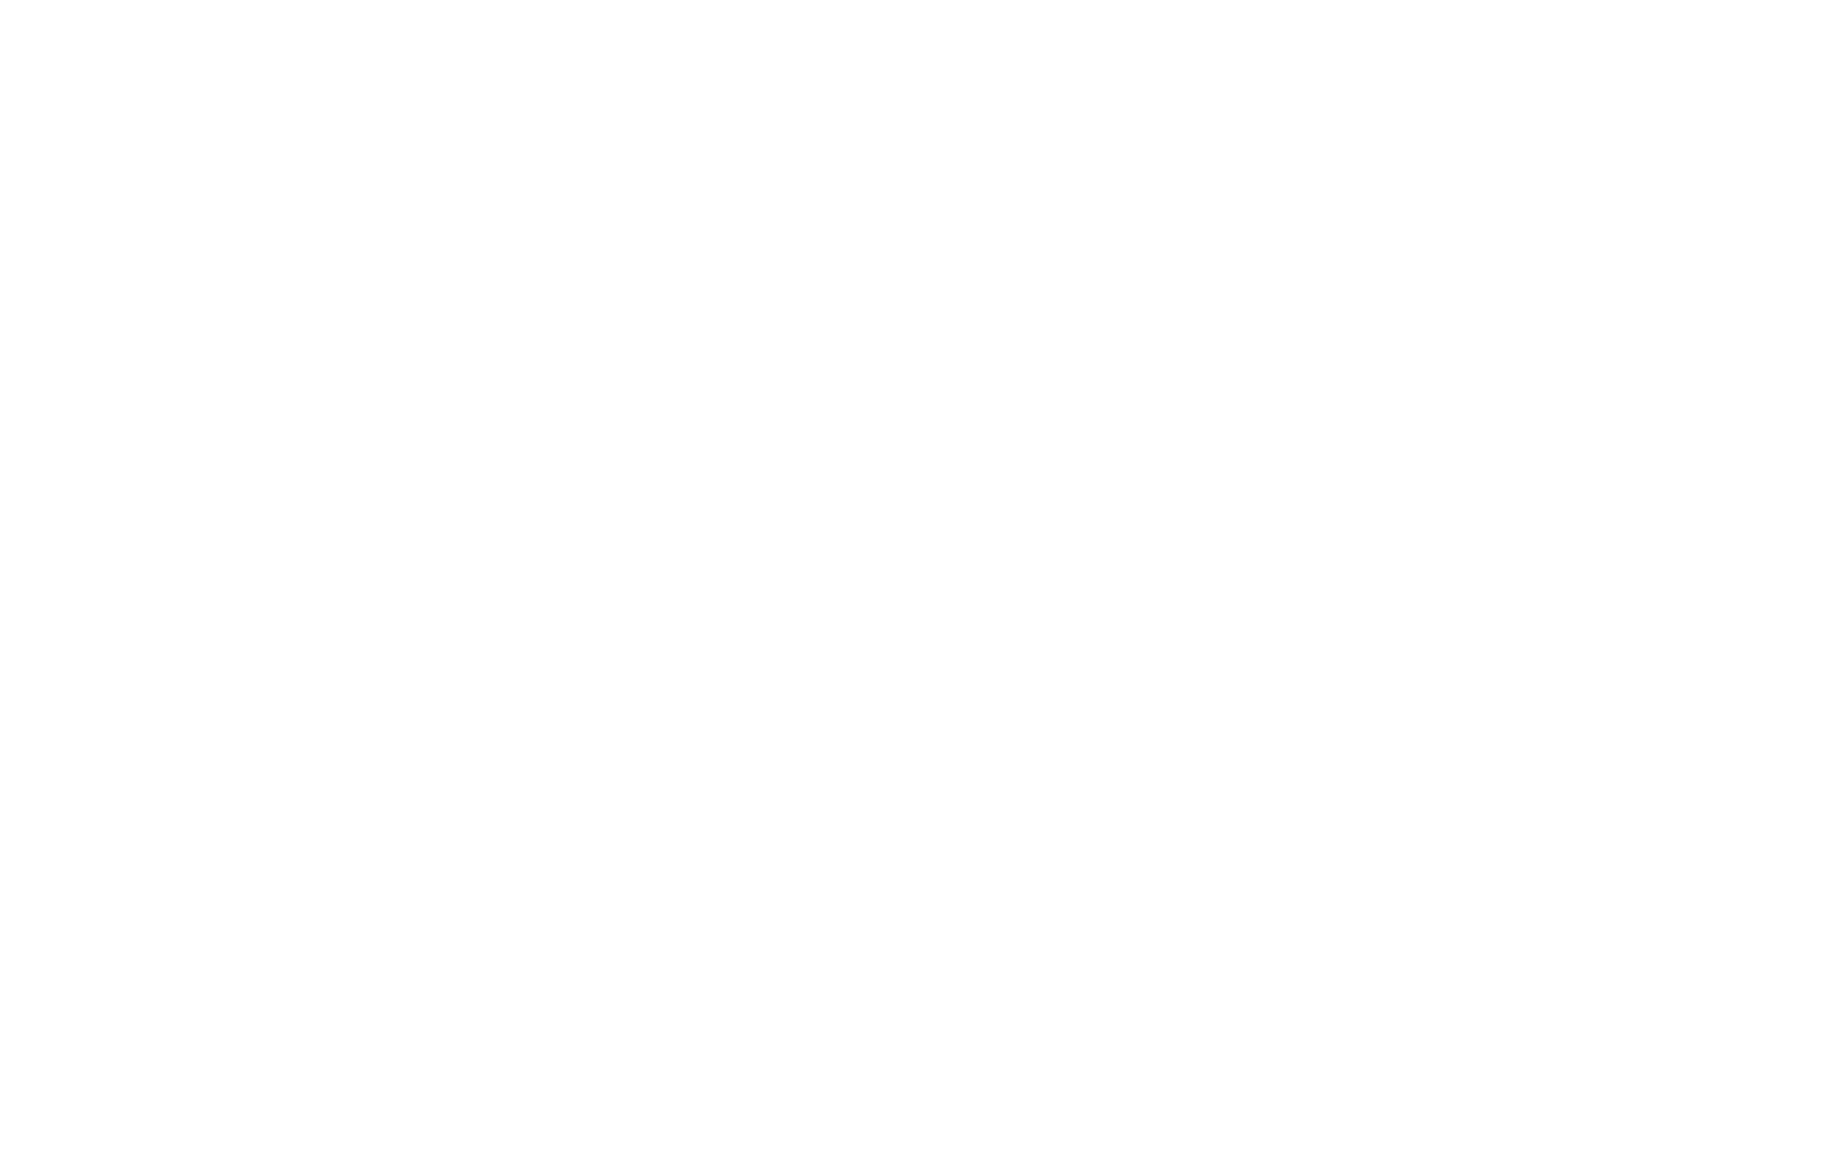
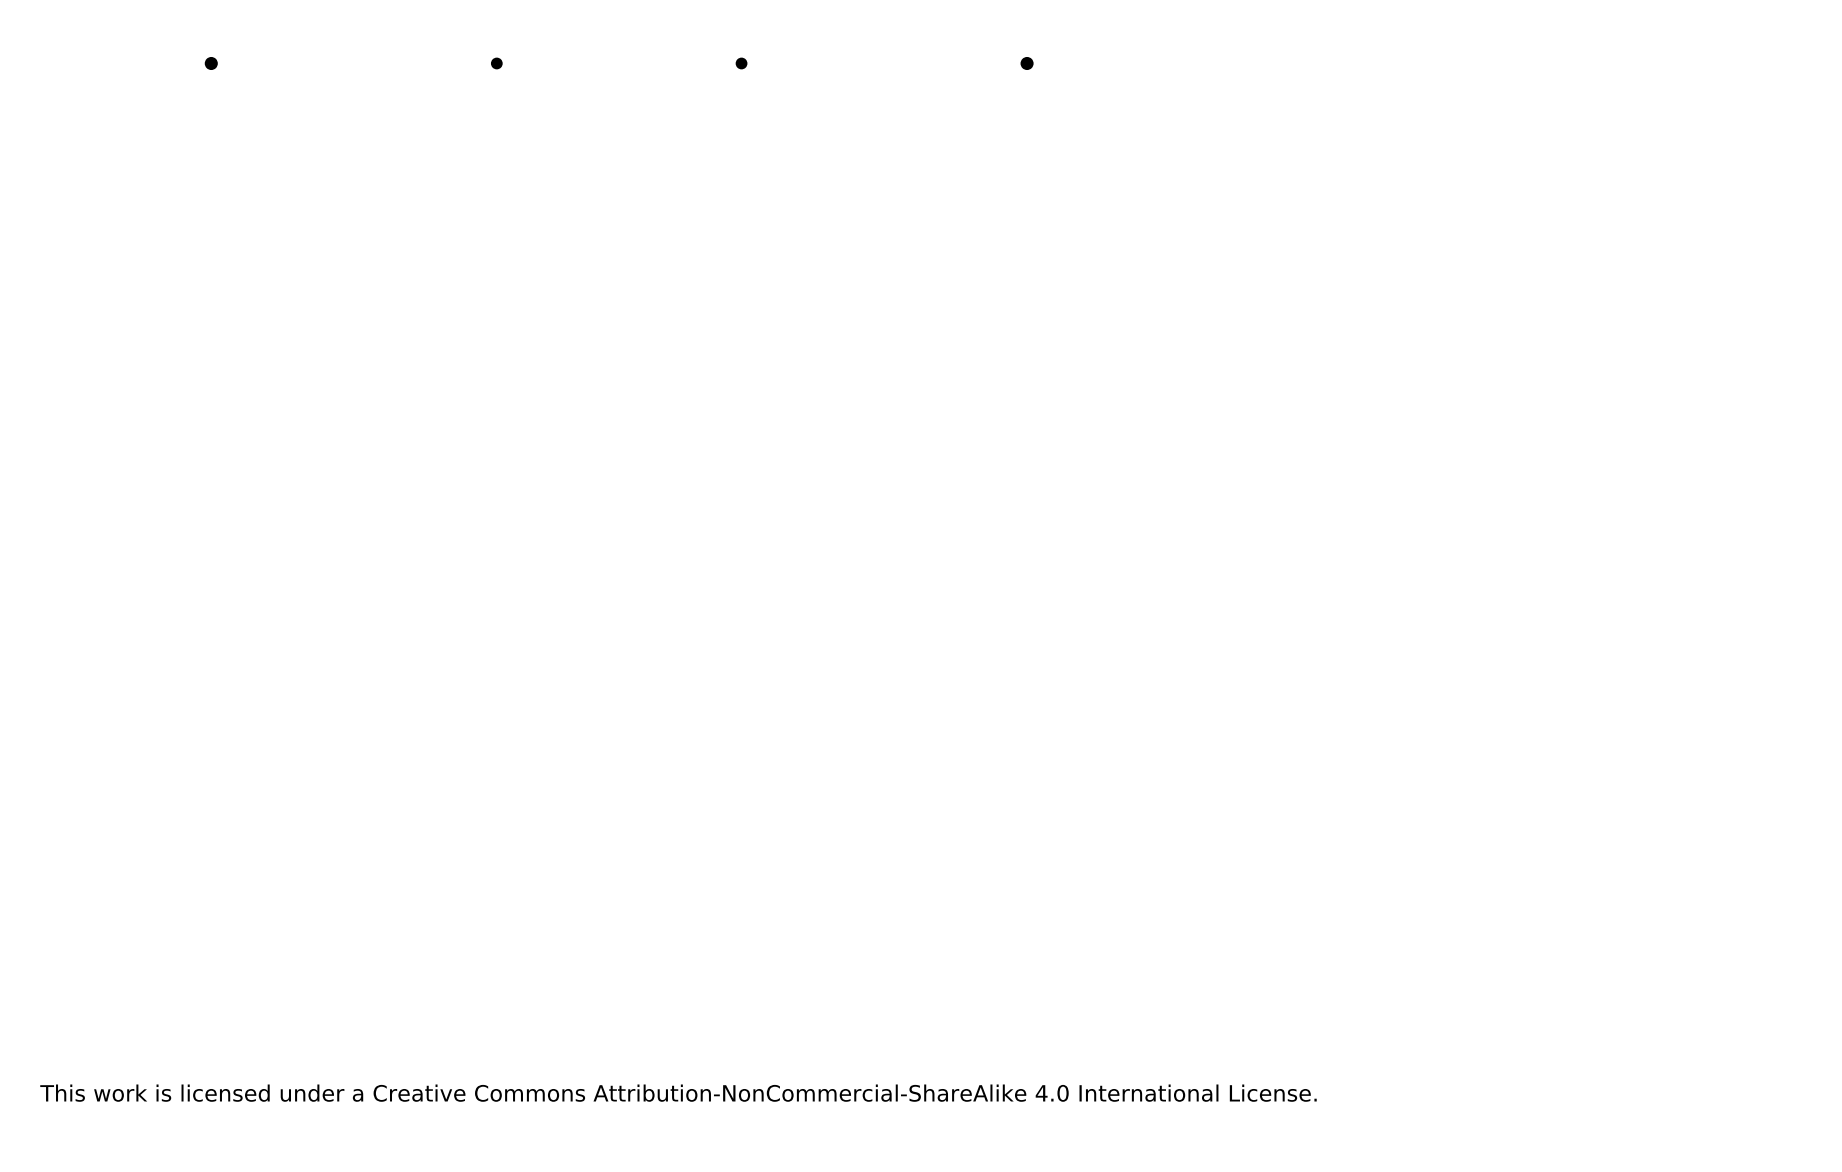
junction: none -> (211, 63)
junction: none -> (496, 63)
junction: none -> (741, 63)
junction: none -> (1027, 63)
text: none -> This work is licensed under a Creative Commons Attribution-NonCommercial-ShareAlike 4.0 International License. (678, 1093)

